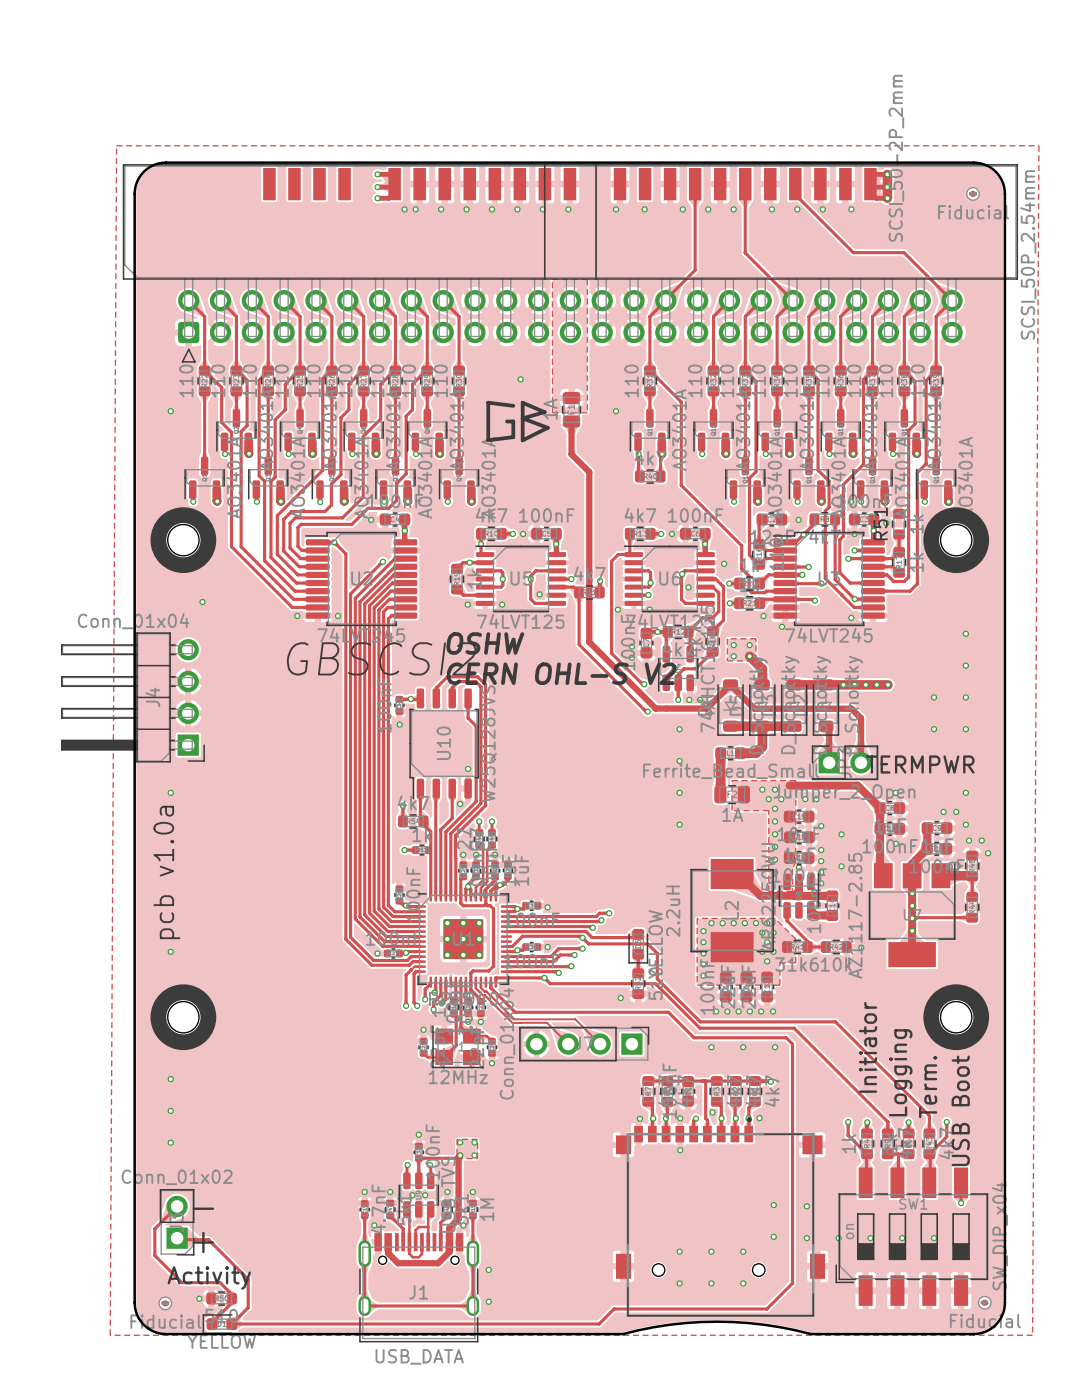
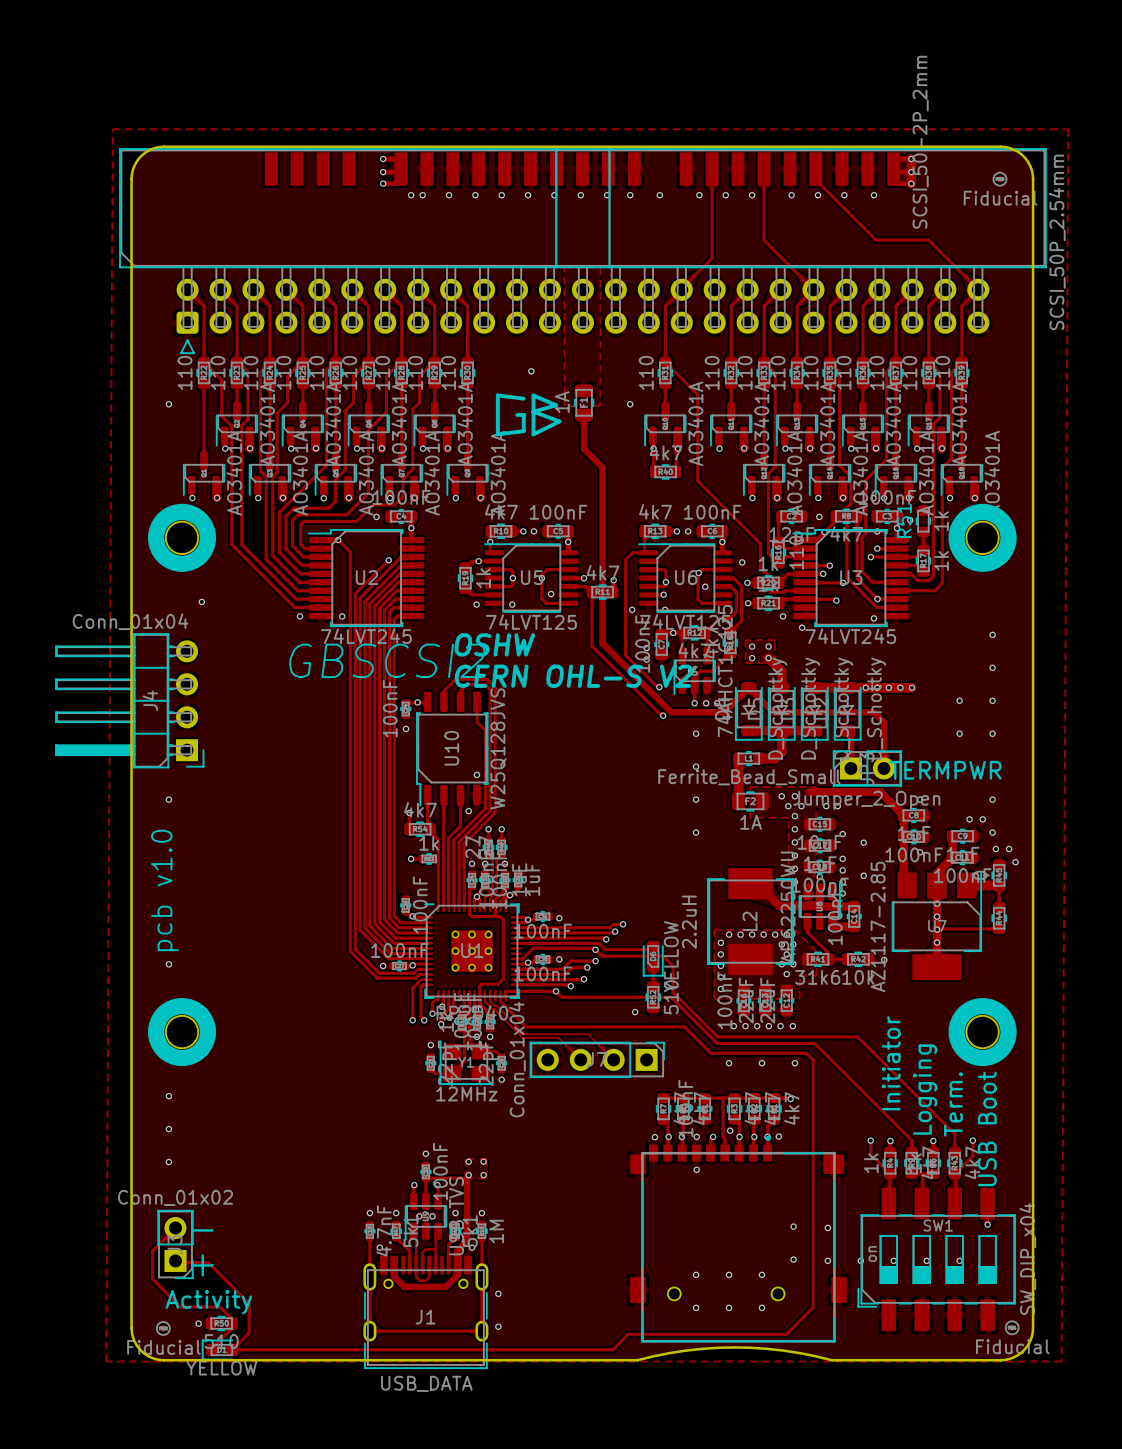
part footprint: [263, 167, 877, 201] -> [264, 152, 901, 186]
via: none -> (607, 195)
text: pcb v1.0a (166, 872) -> pcb v1.0 (164, 890)

